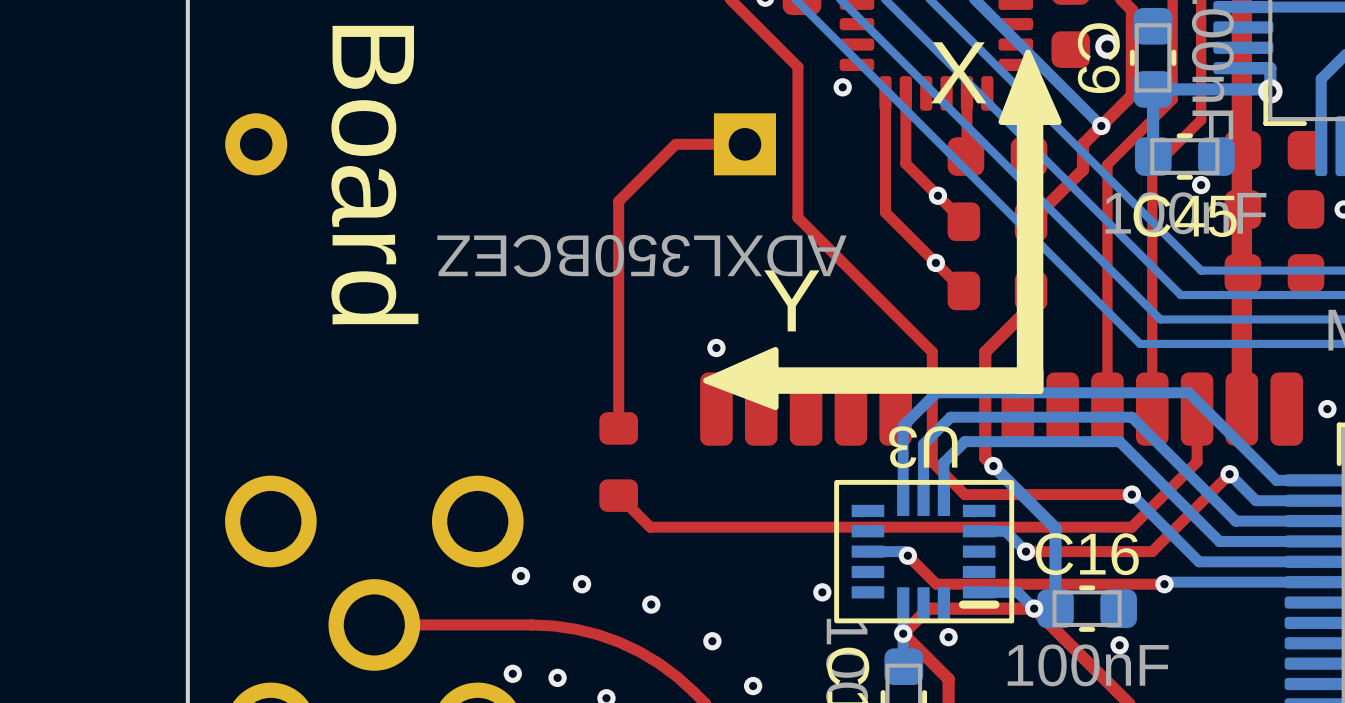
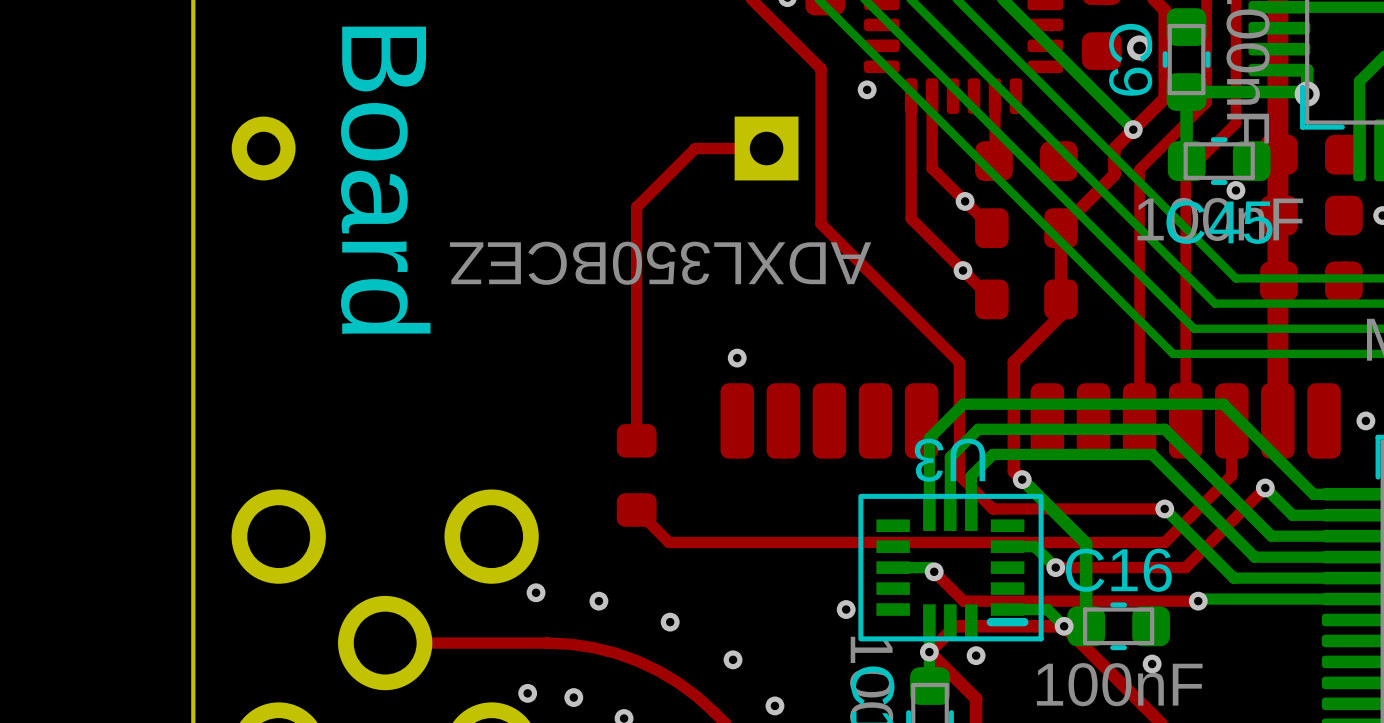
drawing: [703, 49, 1062, 411] -> none
text: X (958, 72) -> none
text: Y (791, 300) -> none

